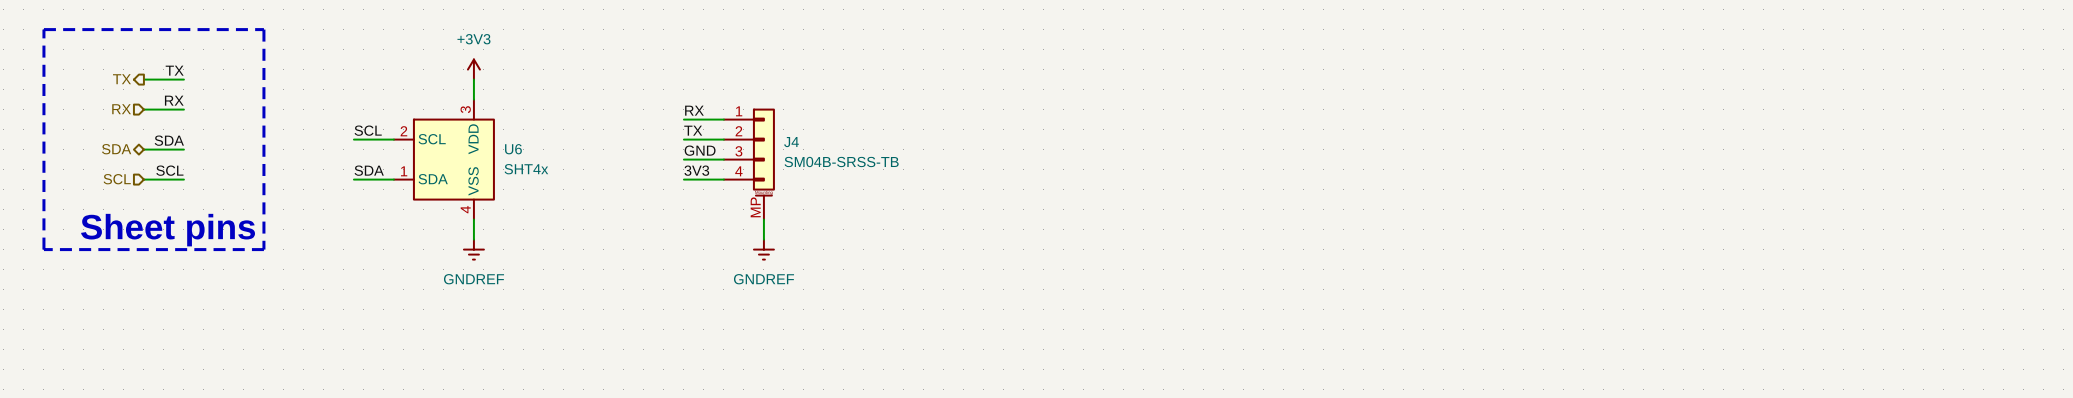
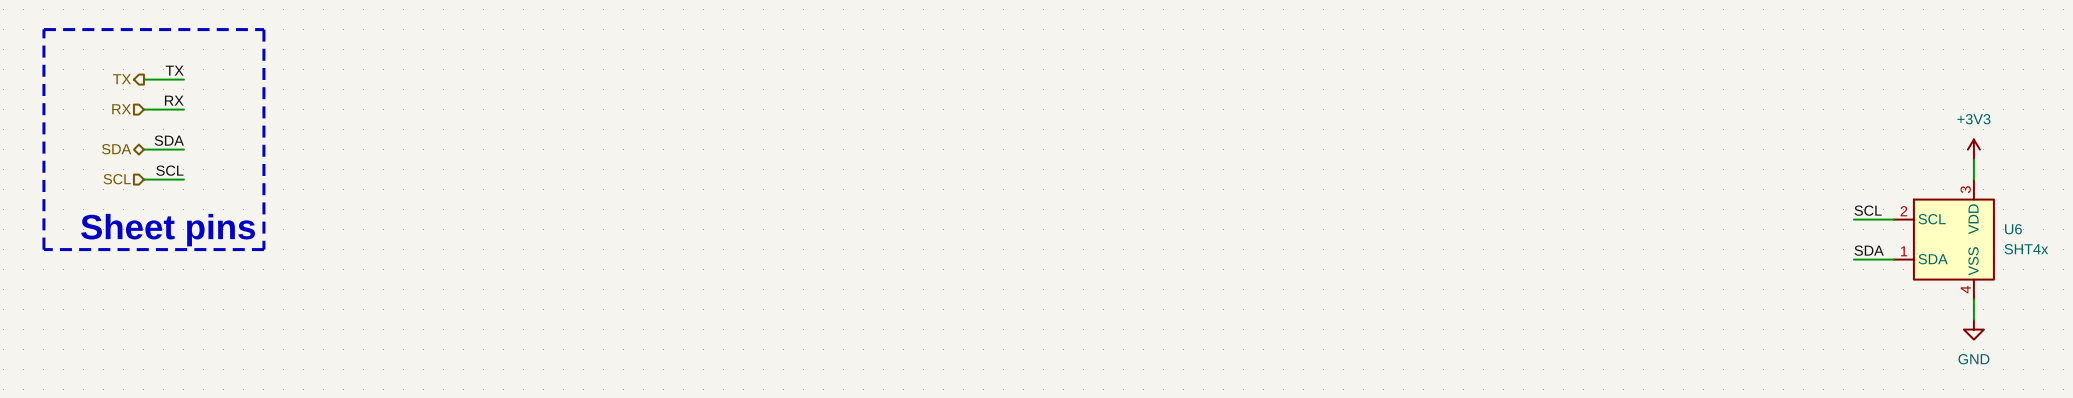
power symbol: +3V3 (473, 69) -> none
wire: (473, 79) (473, 99) -> none
label: RX (694, 110) -> none
wire: (683, 119) (723, 119) -> none
label: SCL (368, 130) -> none
label: TX (693, 130) -> none
wire: (353, 139) (393, 139) -> none
wire: (683, 139) (723, 139) -> none
power symbol: none -> +3V3 (1973, 149)
label: GND (700, 150) -> none
U6 position: (444, 159) -> (1944, 239)
wire: (683, 159) (723, 159) -> none
wire: none -> (1973, 159) (1973, 179)
J4: SM04B-SRSS-TB (749, 164) -> none
label: SDA (369, 170) -> none
label: 3V3 (696, 170) -> none
wire: (353, 179) (393, 179) -> none
wire: (683, 179) (723, 179) -> none
label: none -> SCL (1868, 210)
wire: (473, 219) (473, 239) -> none
wire: (763, 219) (763, 239) -> none
wire: none -> (1853, 219) (1893, 219)
power symbol: GNDREF (473, 249) -> none
power symbol: GNDREF (763, 249) -> none
label: none -> SDA (1869, 250)
wire: none -> (1853, 259) (1893, 259)
wire: none -> (1973, 299) (1973, 319)
power symbol: none -> GND (1973, 329)

